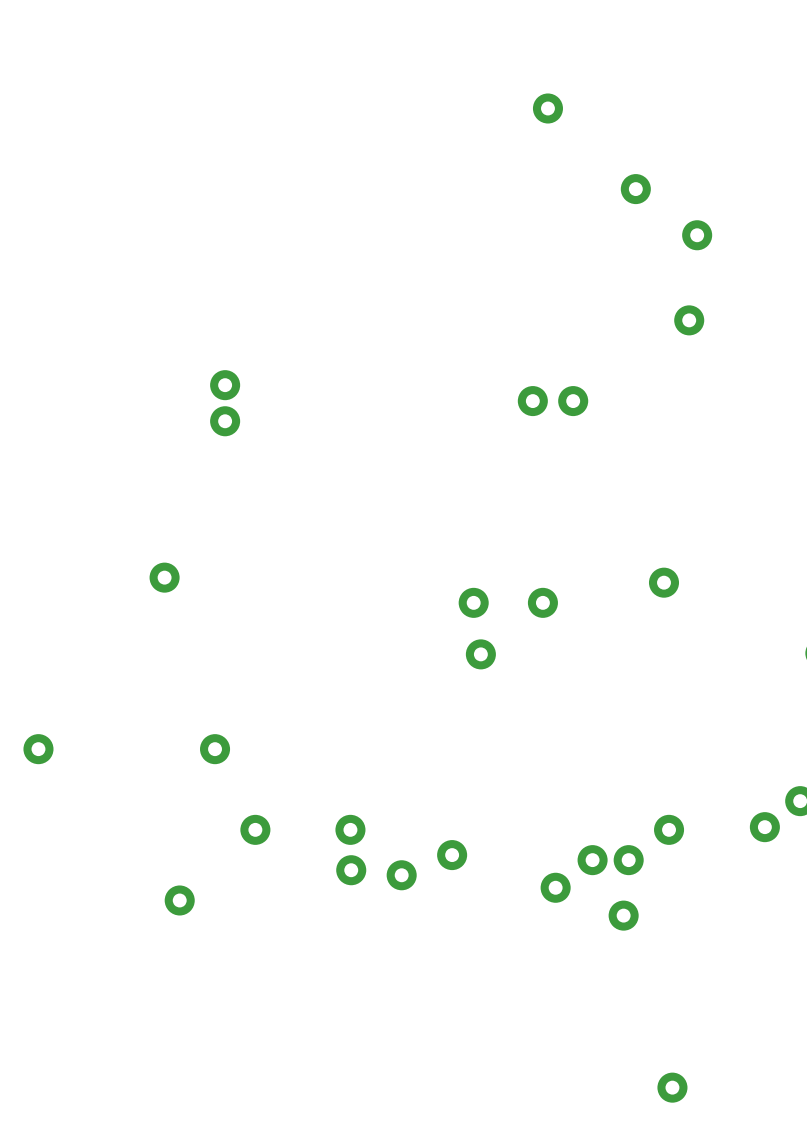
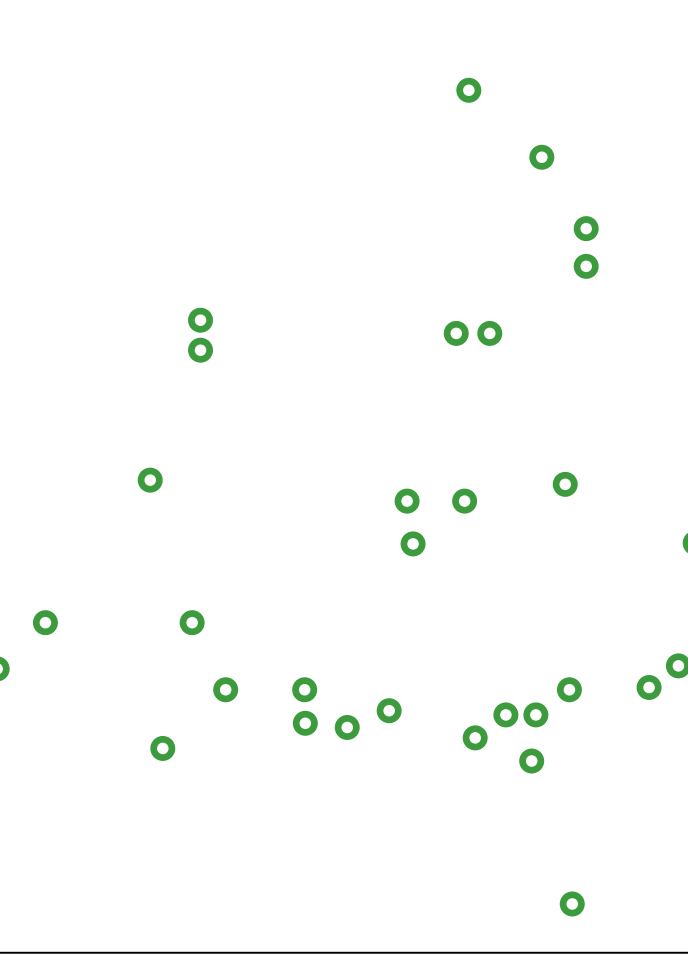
via position: (697, 235) -> (586, 228)

